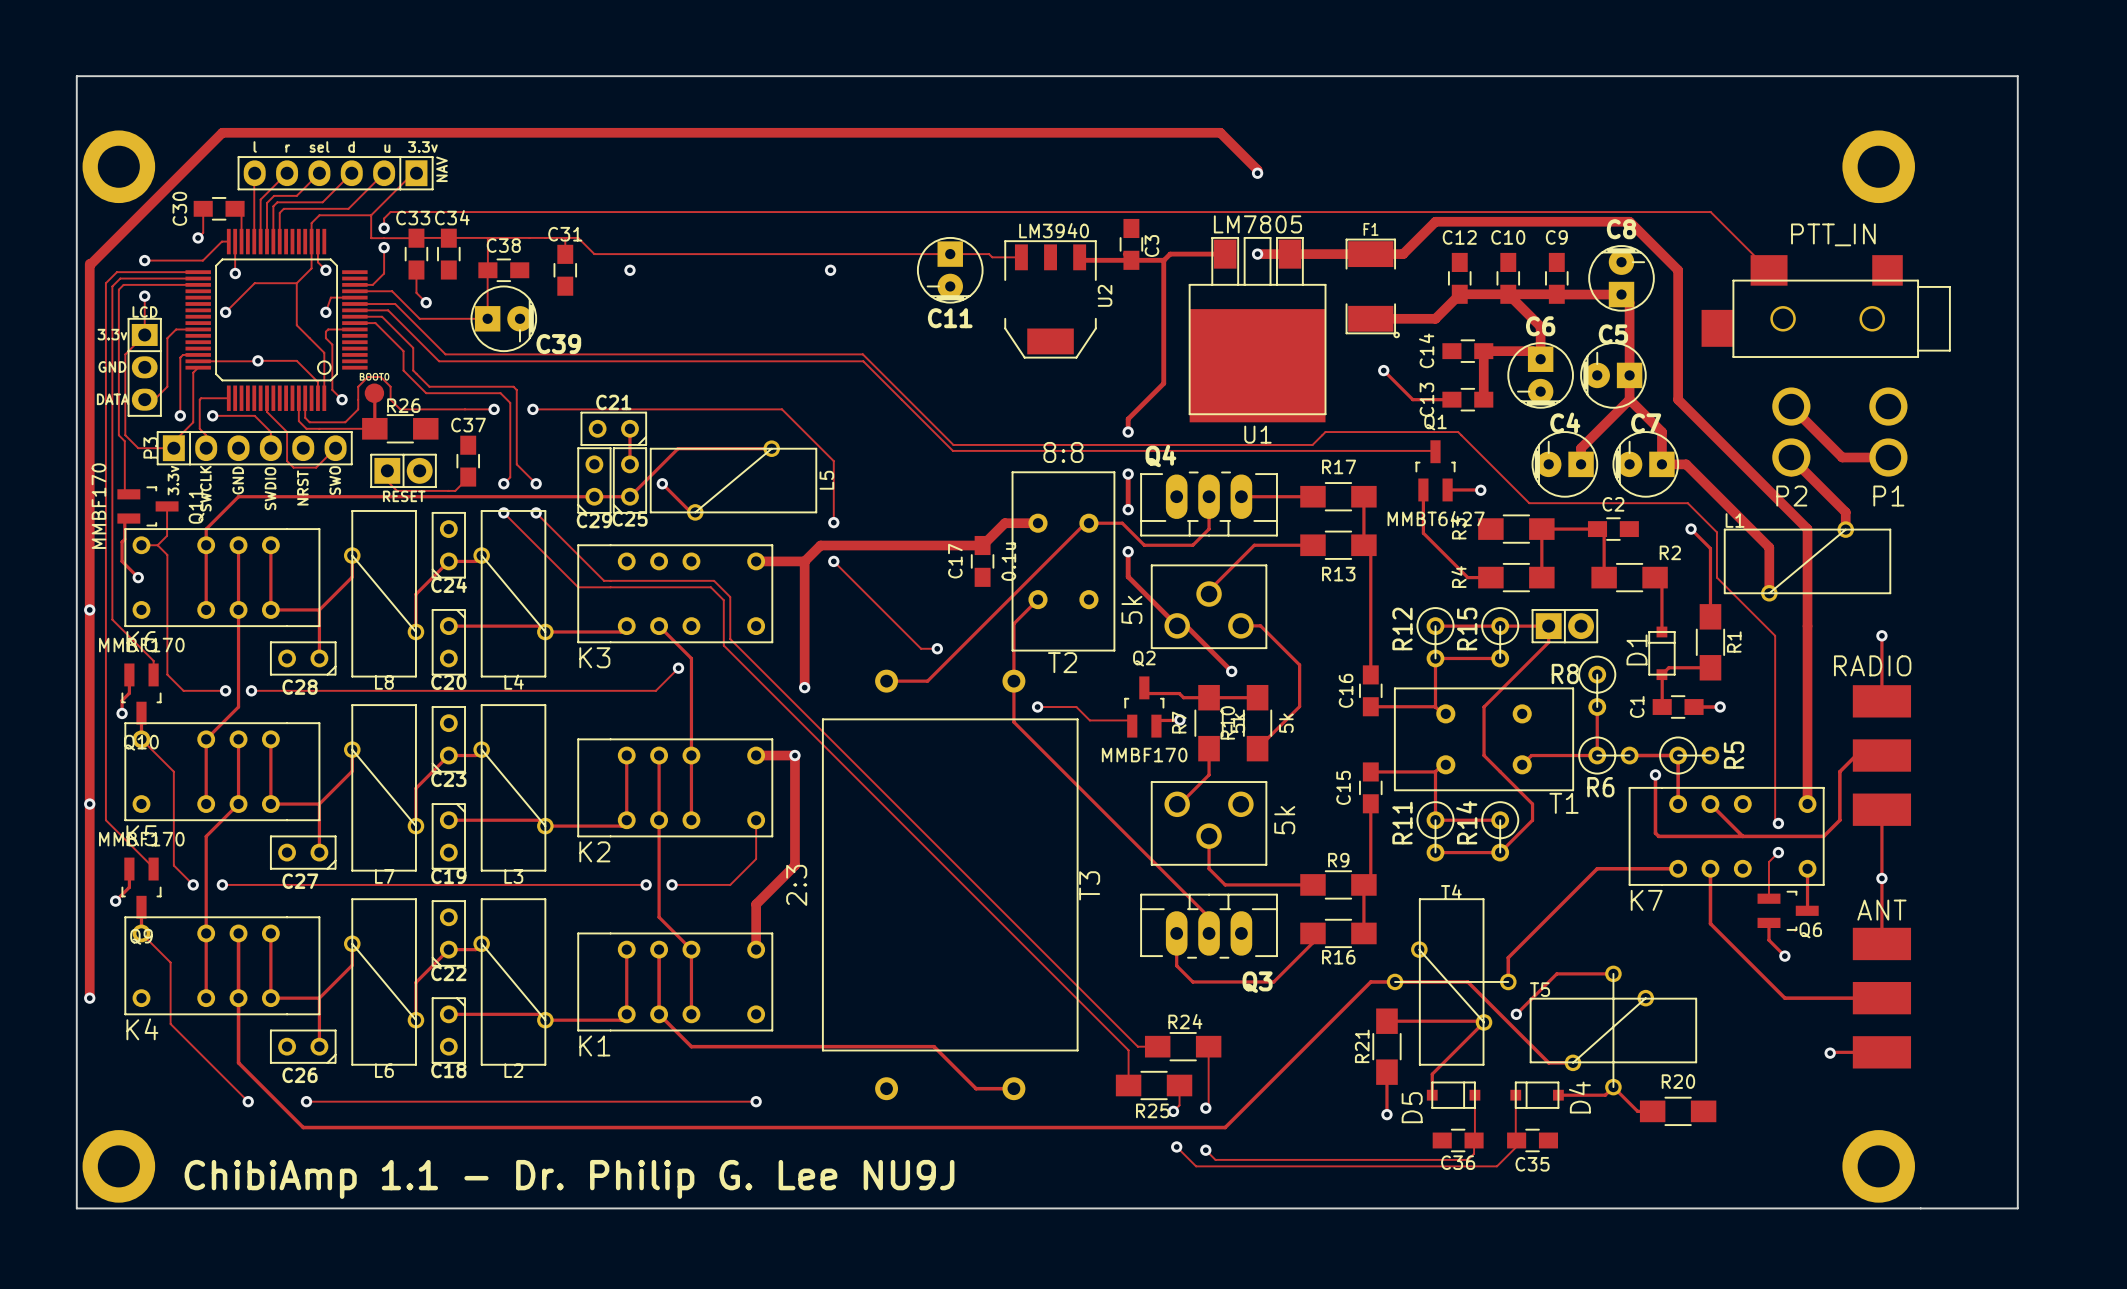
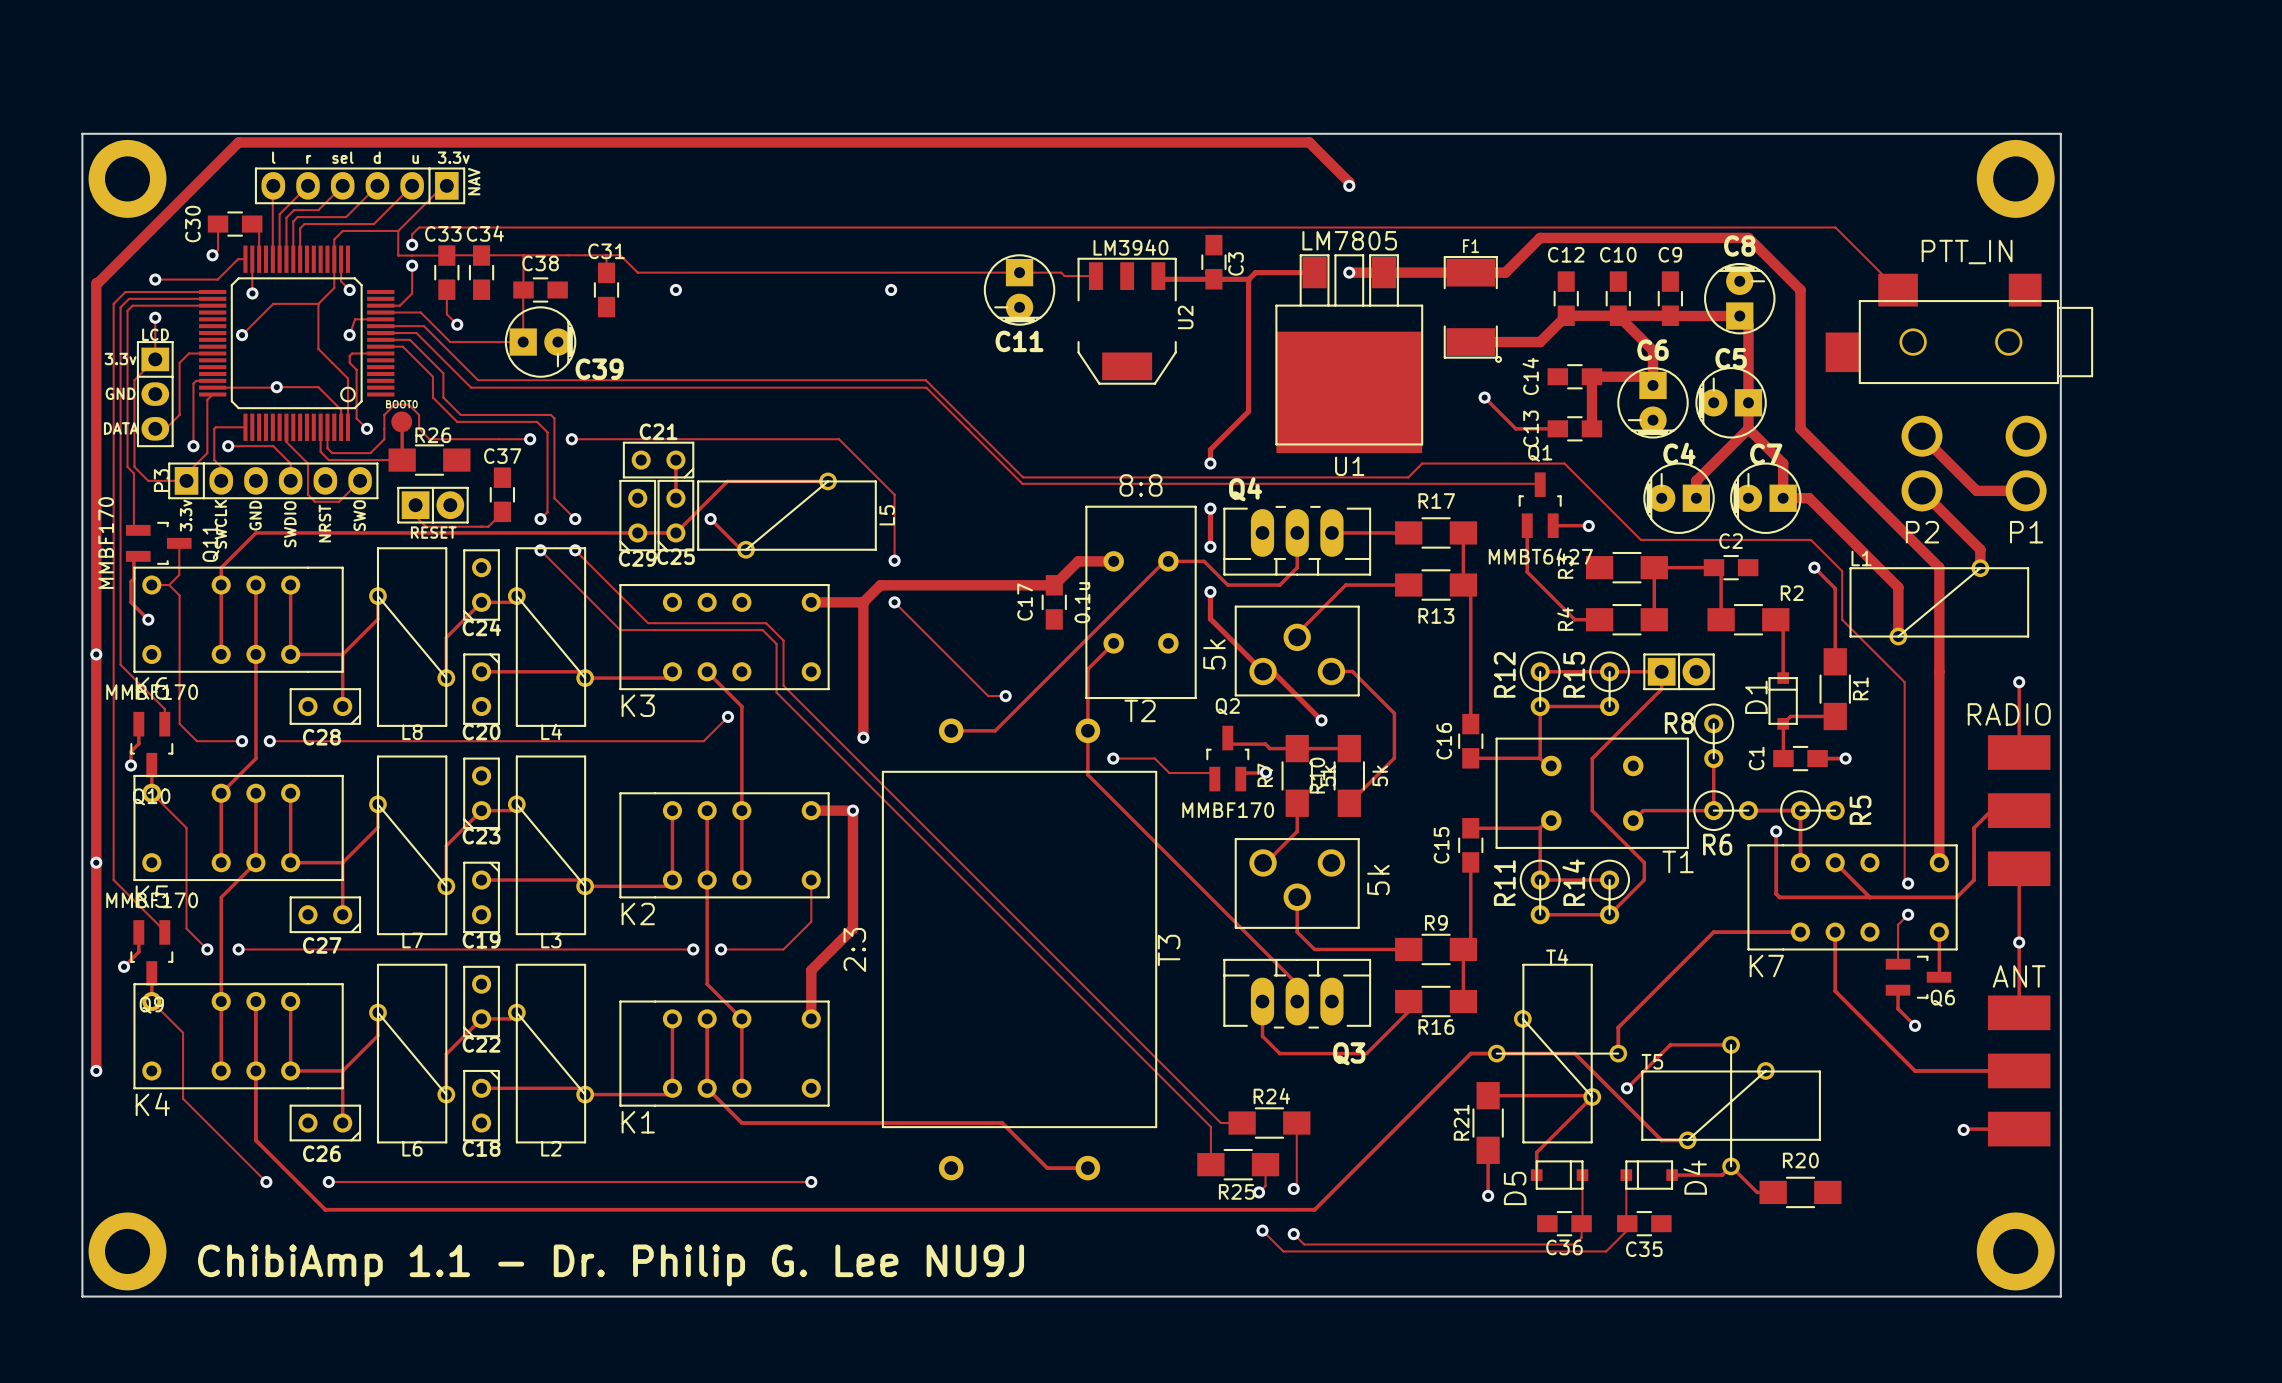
board edge: (76, 124) (76, 76) (2017, 76) (2017, 1208) (1920, 1208) -> (82, 133) (2060, 133) (2060, 1296)

